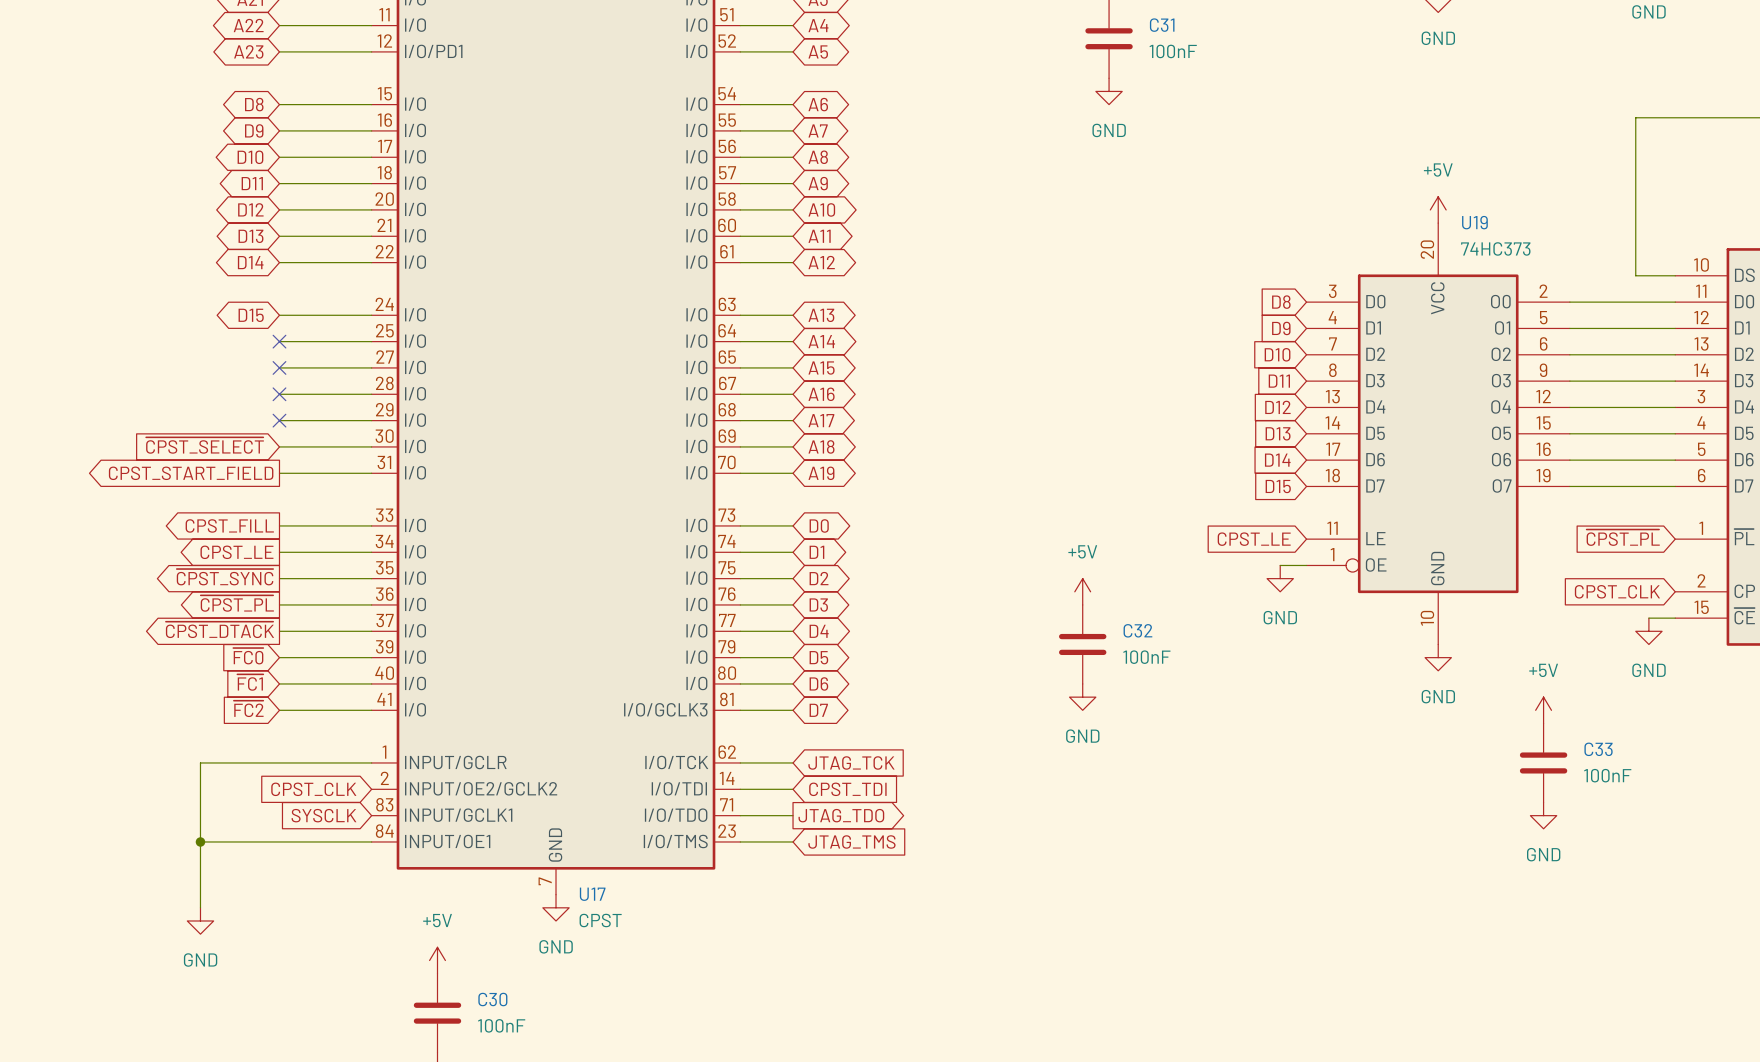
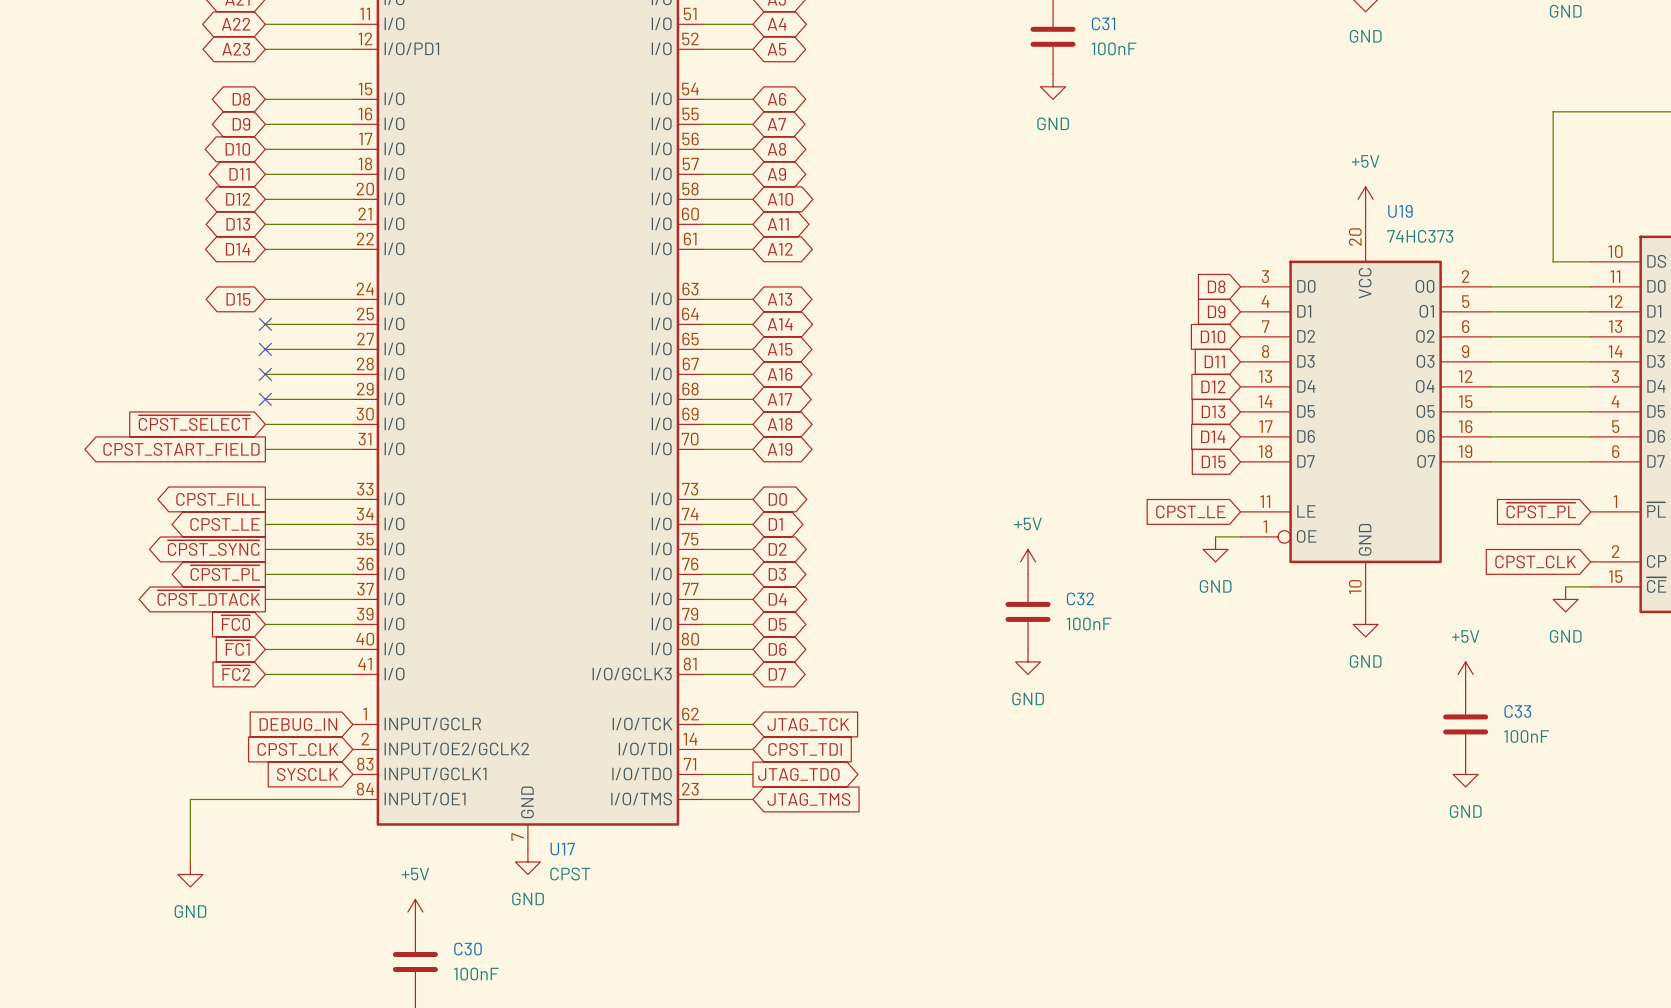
global label: none -> DEBUG_IN (298, 724)
wire: (371, 762) (200, 762) (200, 841) -> none
junction: (200, 841) -> none

